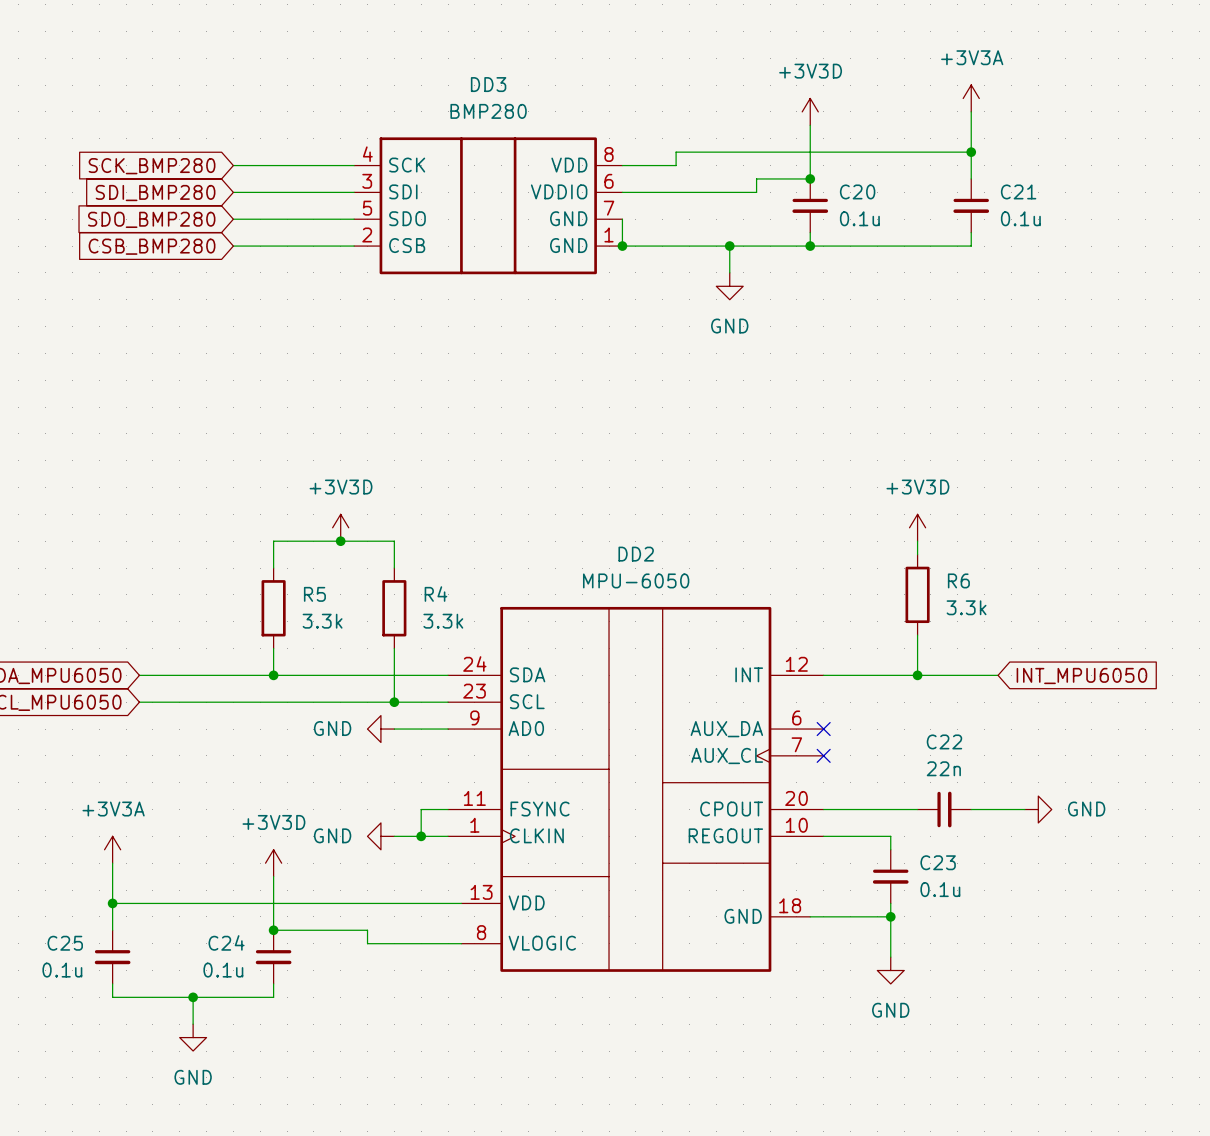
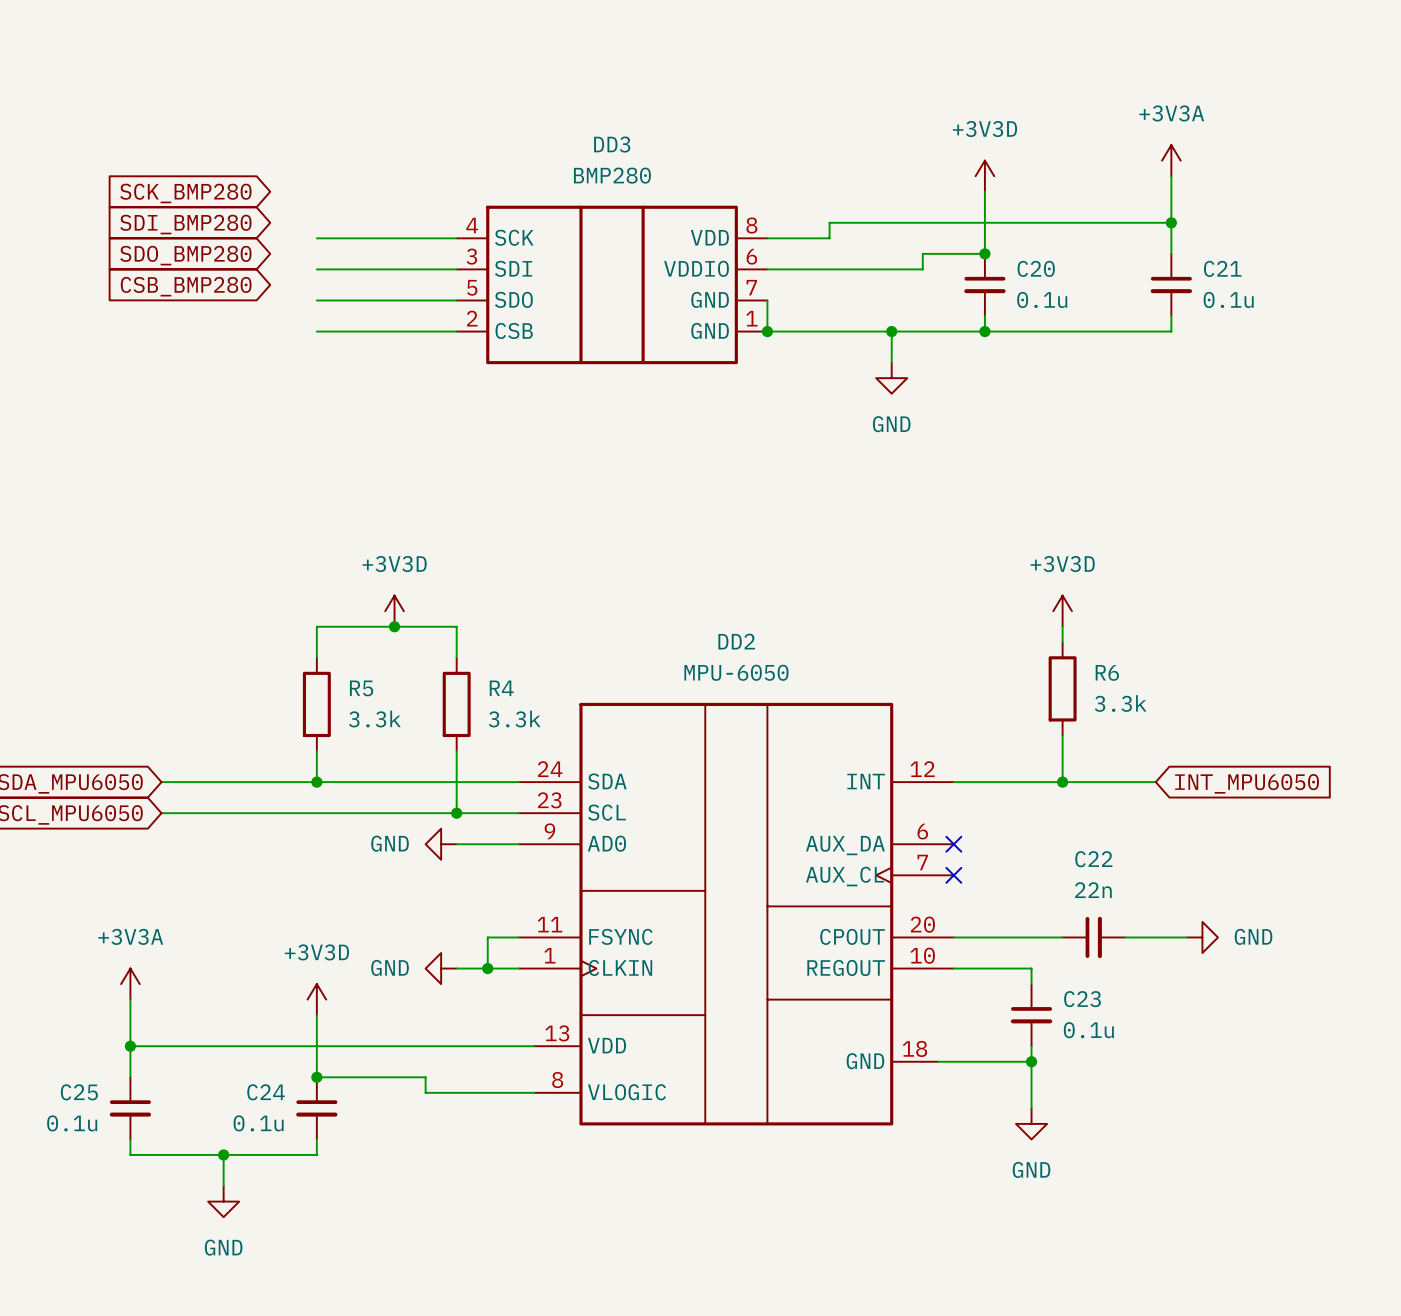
power symbol position: +3V3A (971, 98) -> +3V3A (1171, 160)
power symbol position: +3V3D (810, 111) -> +3V3D (984, 176)
wire: (971, 111) (971, 178) -> (1171, 176) (1171, 253)
wire: (810, 125) (810, 178) (756, 178) (756, 192) -> (1171, 222) (876, 222)
wire: (971, 152) (676, 152) (676, 165) (622, 165) -> none
junction position: (971, 152) -> (1171, 222)
wire: (233, 165) (354, 165) -> (316, 238) (456, 238)
wire: none -> (984, 191) (984, 253) (922, 253) (922, 269) (767, 269)
junction: (810, 178) -> none
wire: (233, 192) (354, 192) -> (316, 269) (456, 269)
wire: (622, 192) (716, 192) -> (767, 238) (829, 238) (829, 222)
DD3 position: (488, 205) -> (612, 284)
C20 position: (810, 205) -> (984, 284)
C21 position: (971, 205) -> (1171, 284)
wire: (233, 219) (354, 219) -> (316, 300) (456, 300)
wire: (622, 219) (622, 246) (971, 246) (971, 232) -> (767, 300) (767, 331) (1171, 331) (1171, 316)
junction: none -> (984, 253)
wire: (810, 232) (810, 246) -> (984, 316) (984, 331)
wire: (233, 246) (354, 246) -> (316, 331) (456, 331)
junction: (622, 246) -> none
wire: (729, 246) (729, 272) -> (891, 331) (891, 362)
junction: (729, 246) -> none
junction: (810, 246) -> none
junction: none -> (767, 331)
power symbol position: GND (729, 286) -> GND (891, 378)
junction: none -> (891, 331)
junction: none -> (984, 331)

